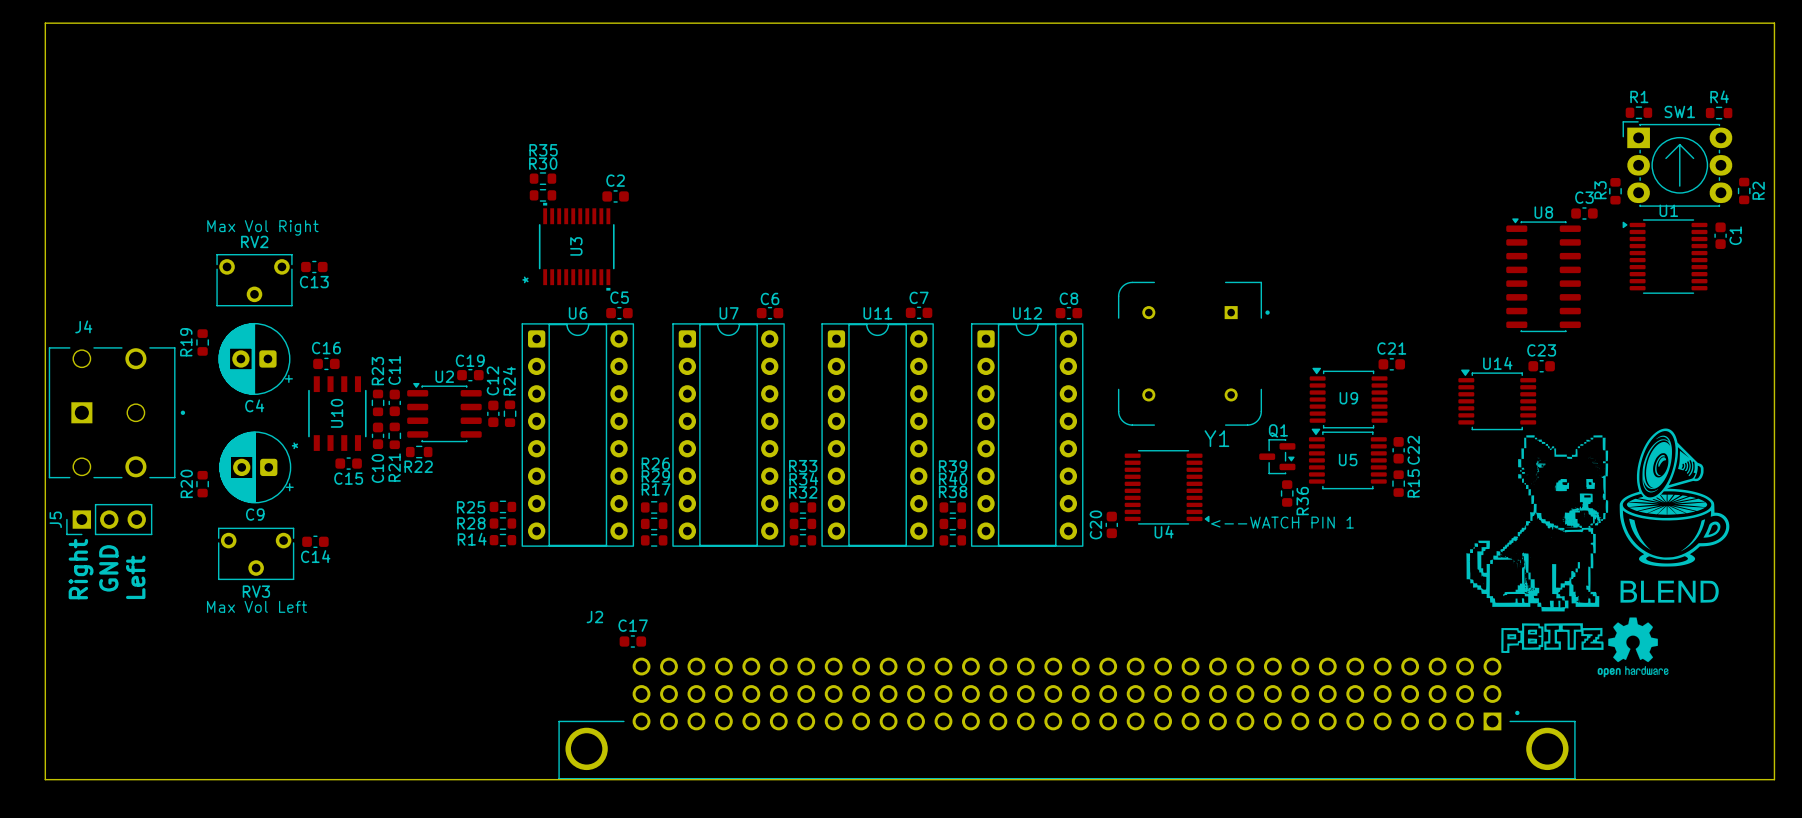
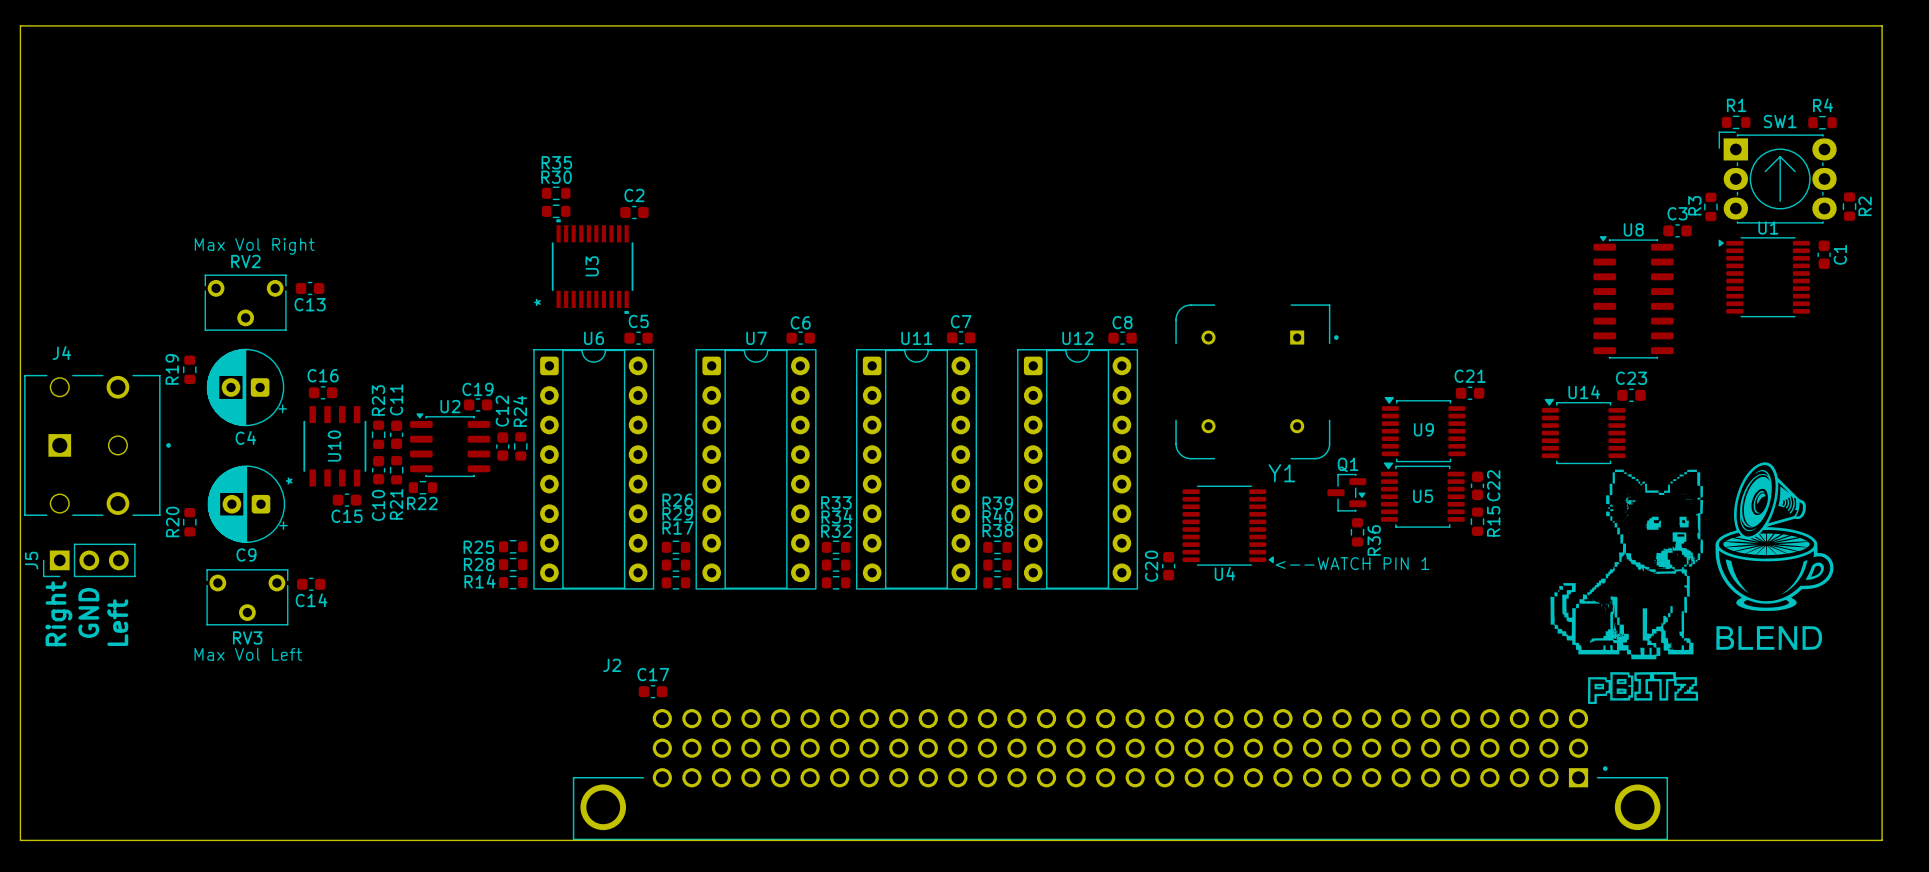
drawing: [1597, 617, 1669, 678] -> none

